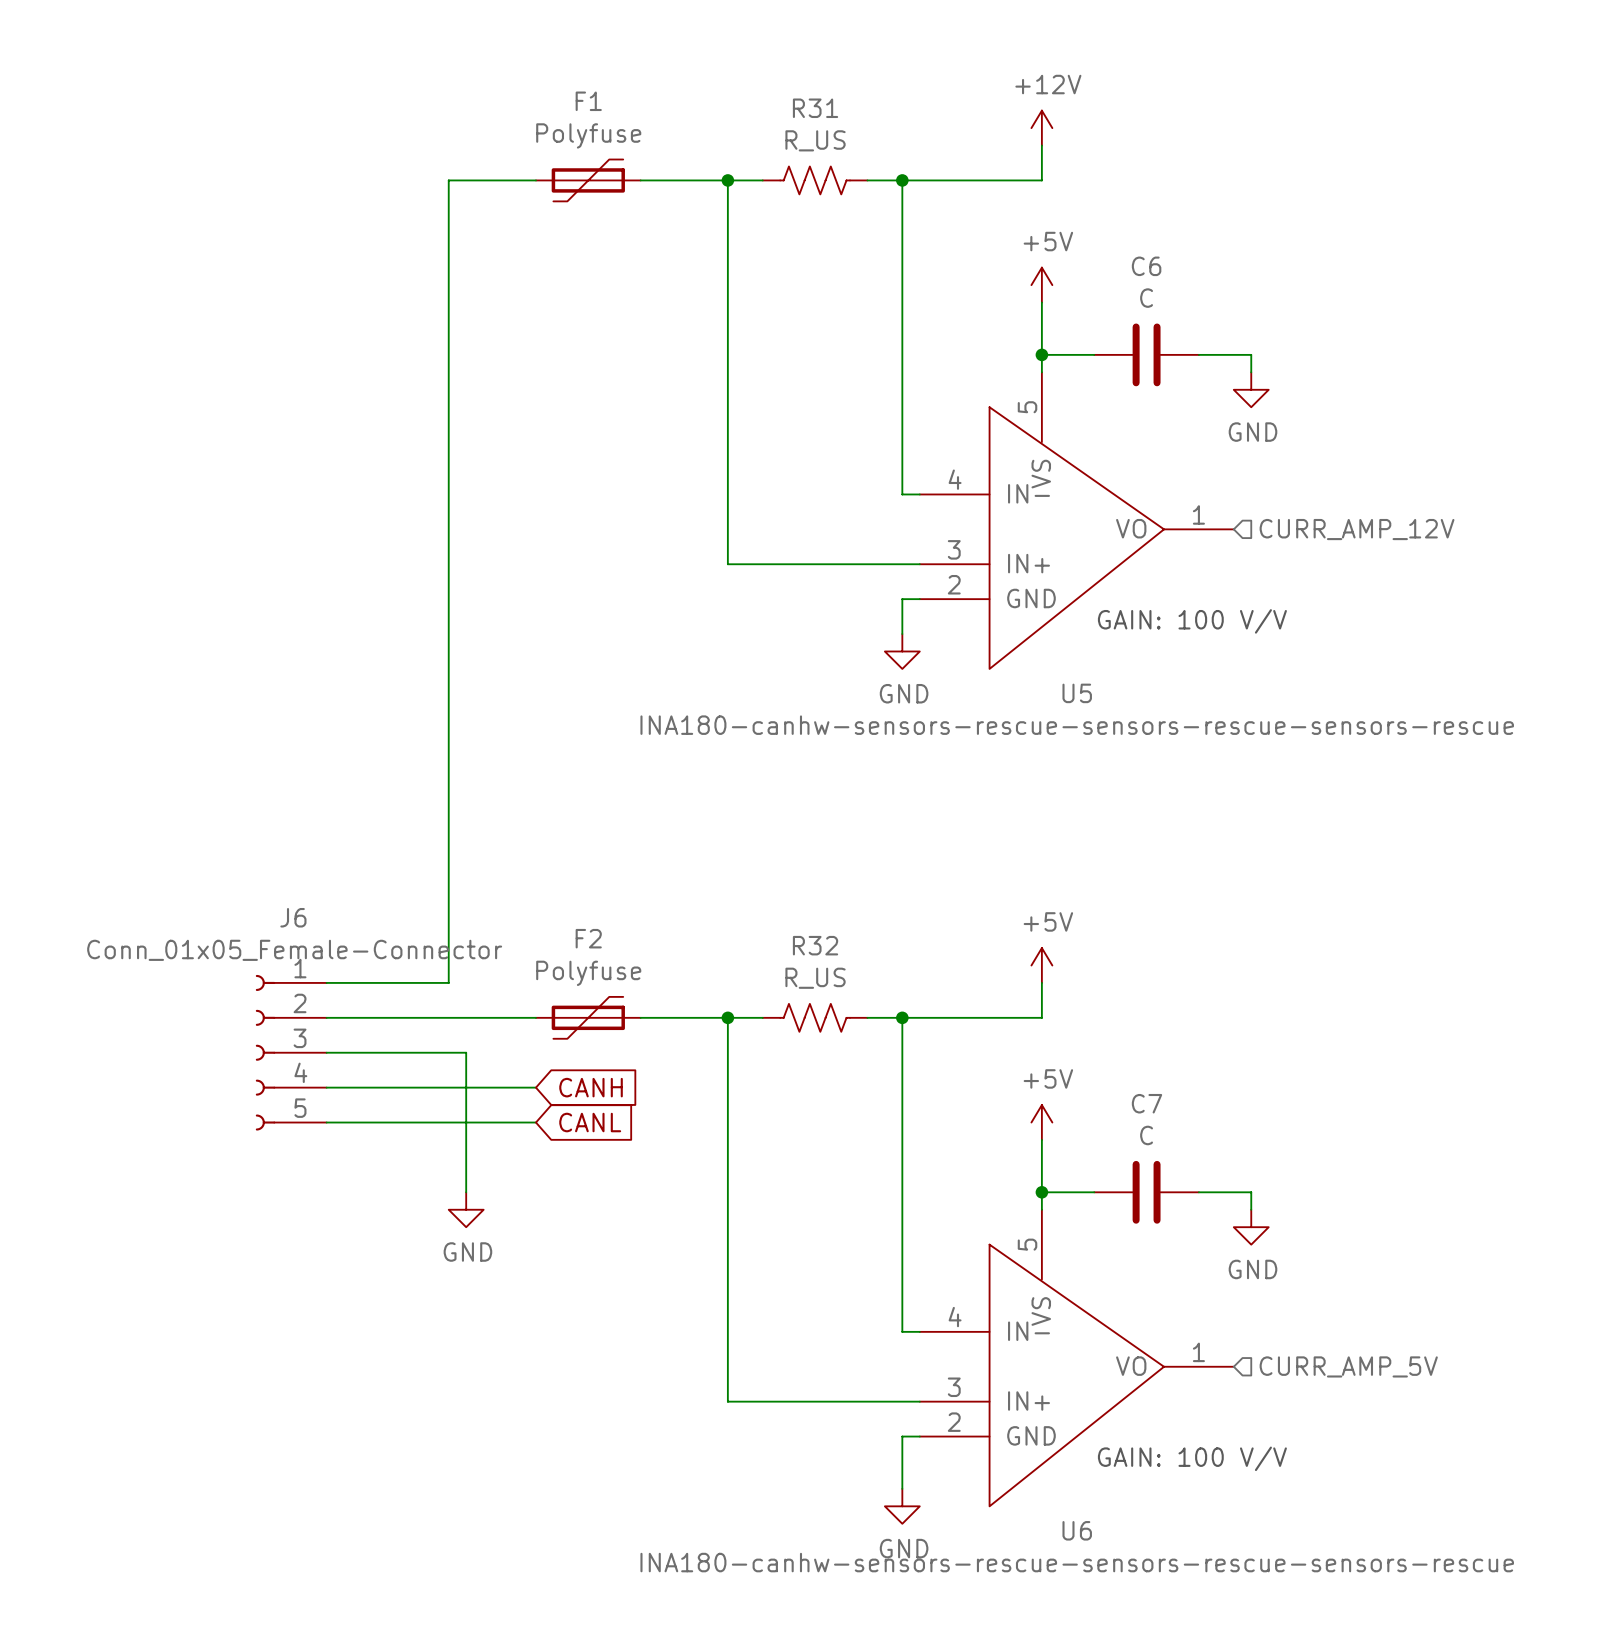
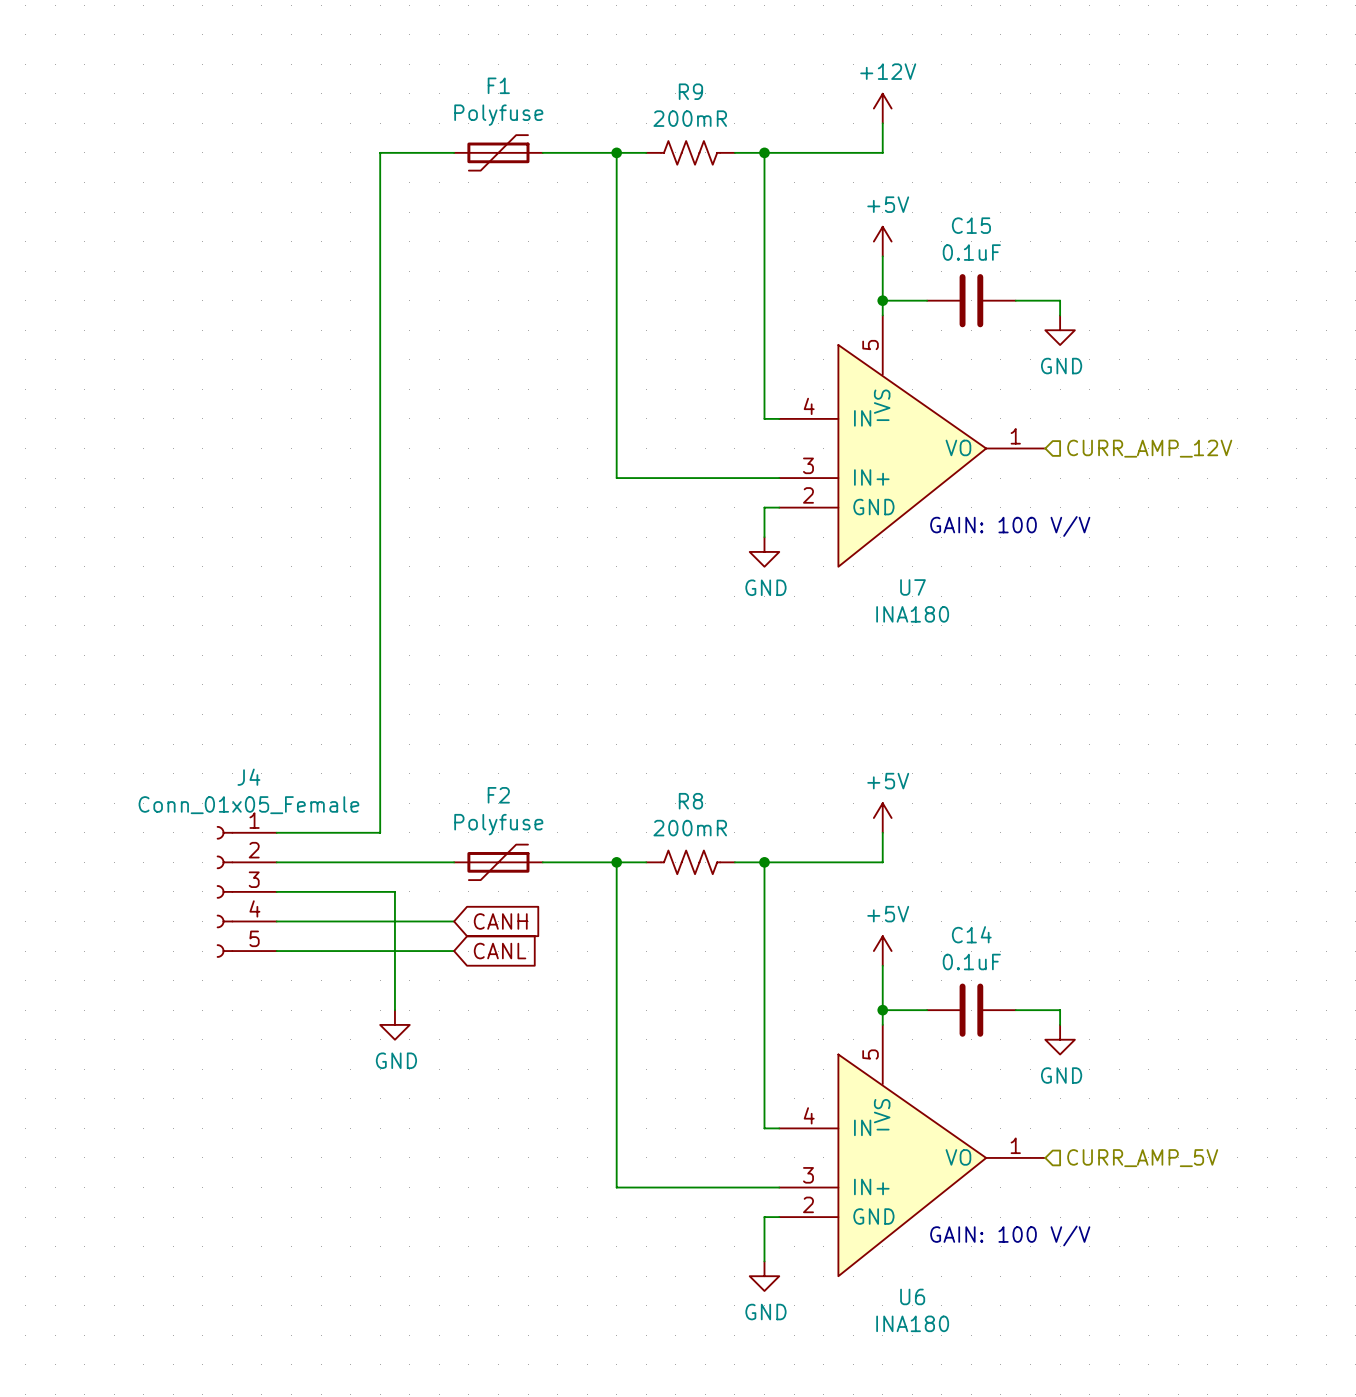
R31 name: R31 (815, 108) -> R9 (690, 91)
R31 value: R_US (815, 140) -> 200mR (690, 118)
C6 name: C6 (1146, 266) -> C15 (971, 225)
C6 value: C (1146, 298) -> 0.1uF (971, 252)
U5 name: U5 (1077, 693) -> U7 (913, 587)
U5 value: INA180-canhw-sensors-rescue-sensors-rescue-sensors-rescue (1077, 725) -> INA180 (912, 614)
J6 name: J6 (293, 917) -> J4 (248, 777)
R32 name: R32 (815, 945) -> R8 (690, 801)
J6 value: Conn_01x05_Female-Connector (294, 950) -> Conn_01x05_Female (248, 805)
R32 value: R_US (815, 978) -> 200mR (690, 828)
C7 name: C7 (1146, 1103) -> C14 (971, 934)
C7 value: C (1146, 1135) -> 0.1uF (971, 962)
U6 value: INA180-canhw-sensors-rescue-sensors-rescue-sensors-rescue (1077, 1562) -> INA180 (912, 1323)

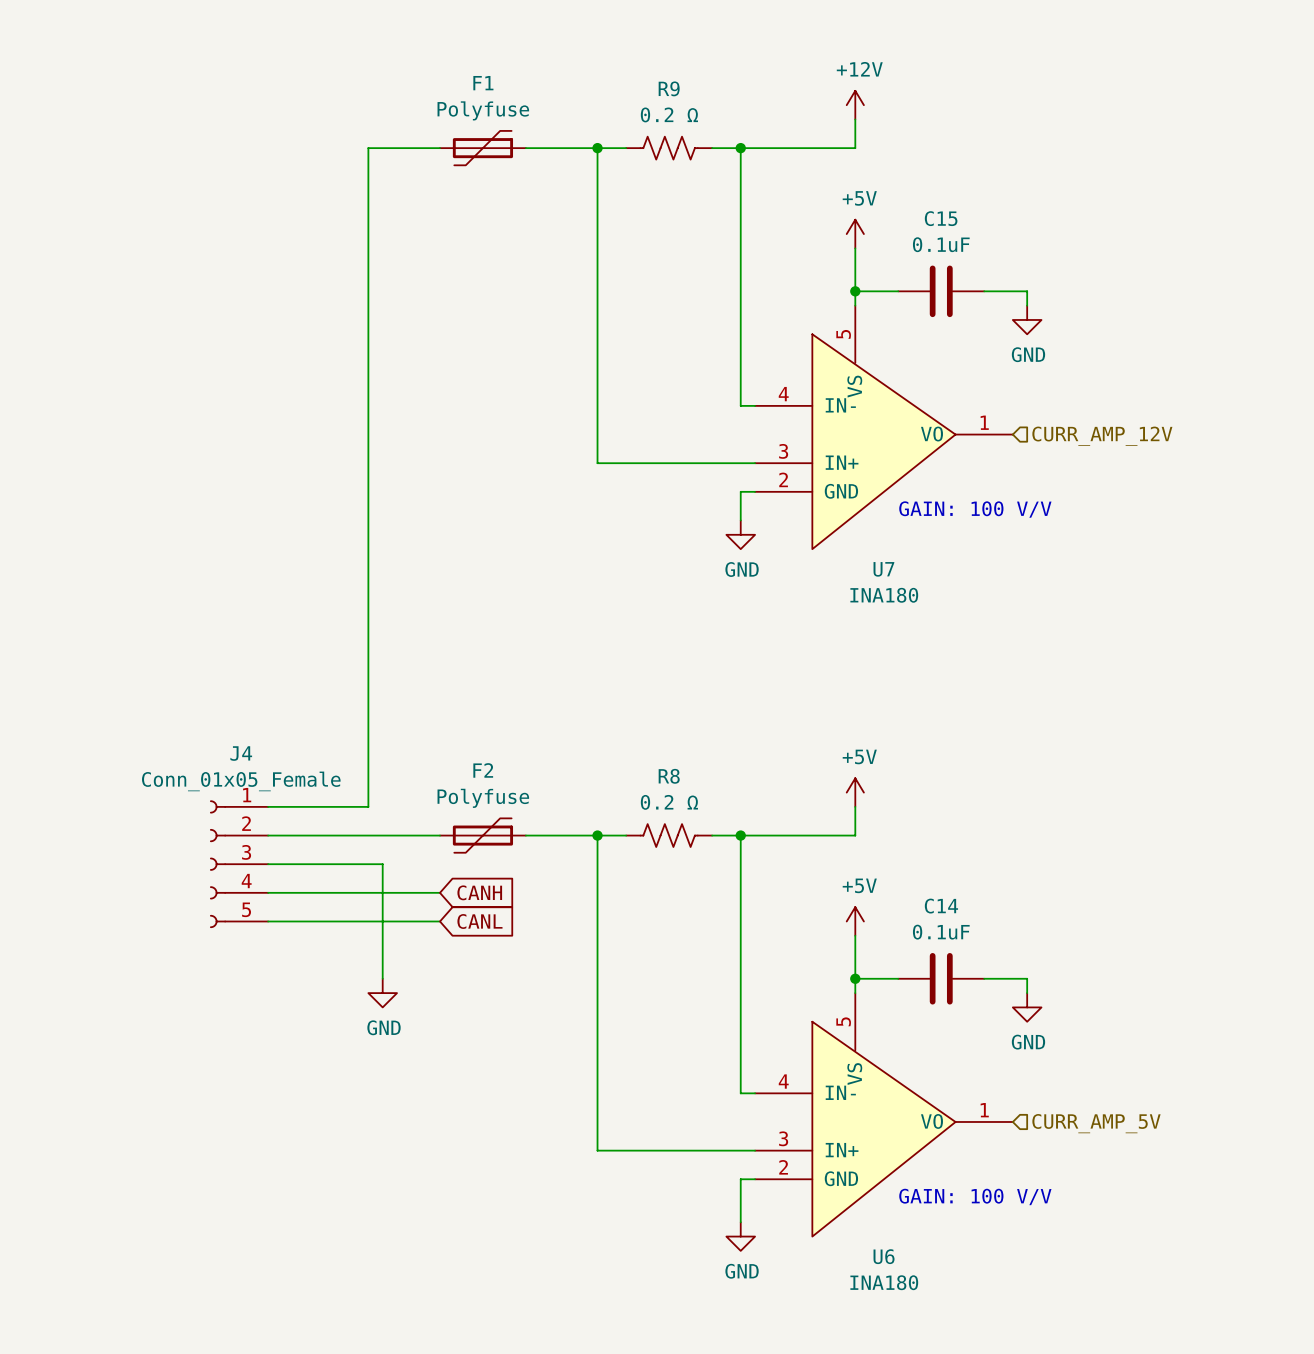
R9 value: 200mR (690, 118) -> 0.2 Ω (669, 114)
R8 value: 200mR (690, 828) -> 0.2 Ω (669, 802)

